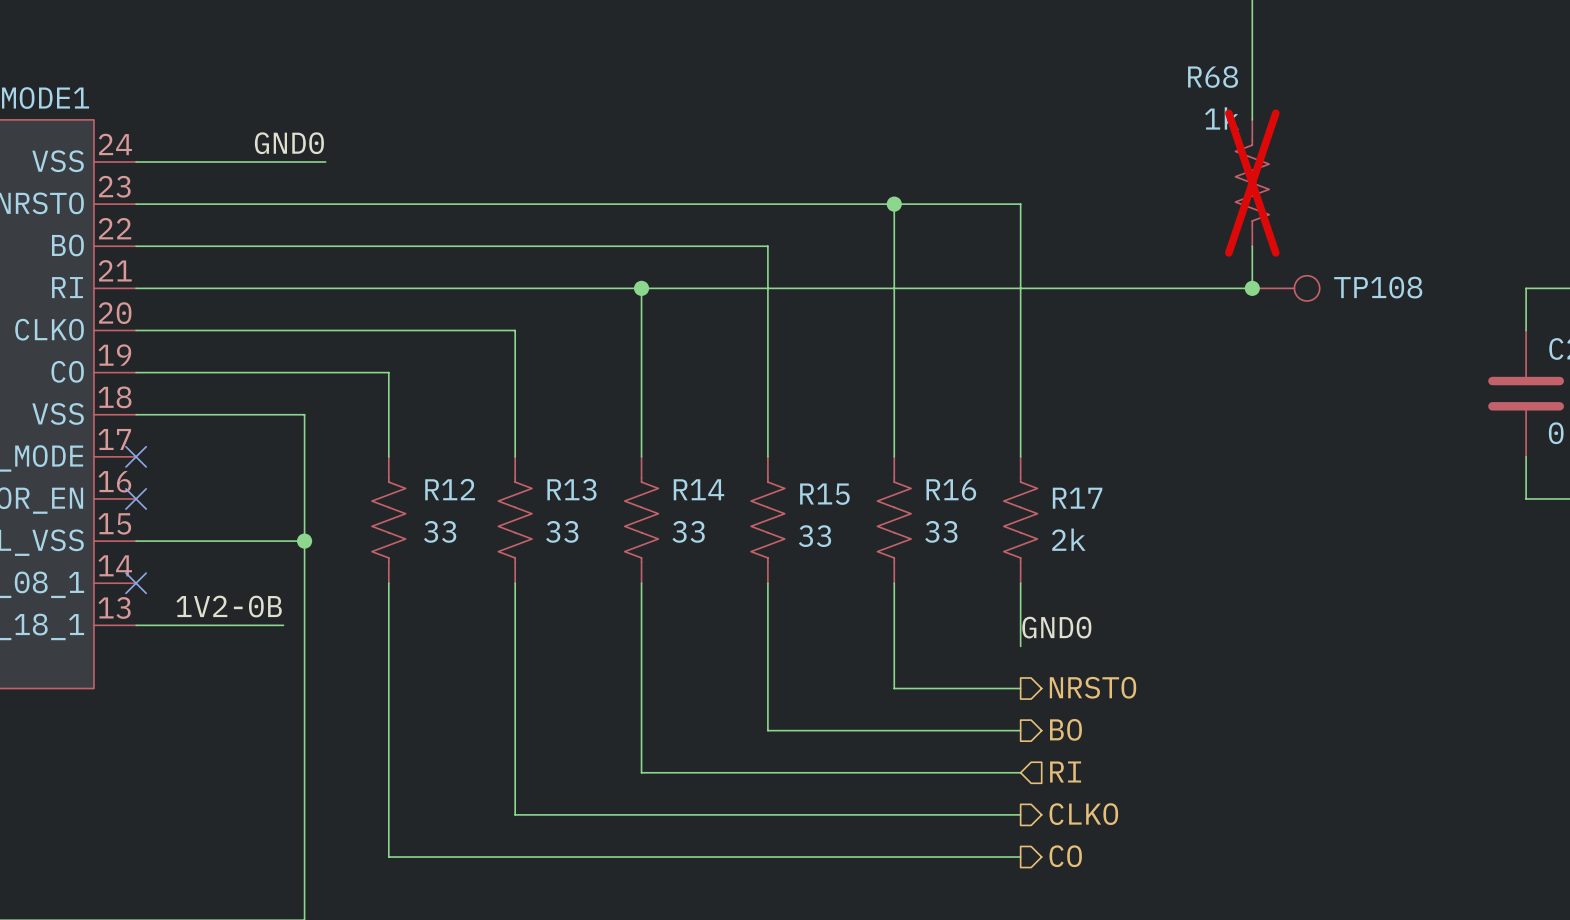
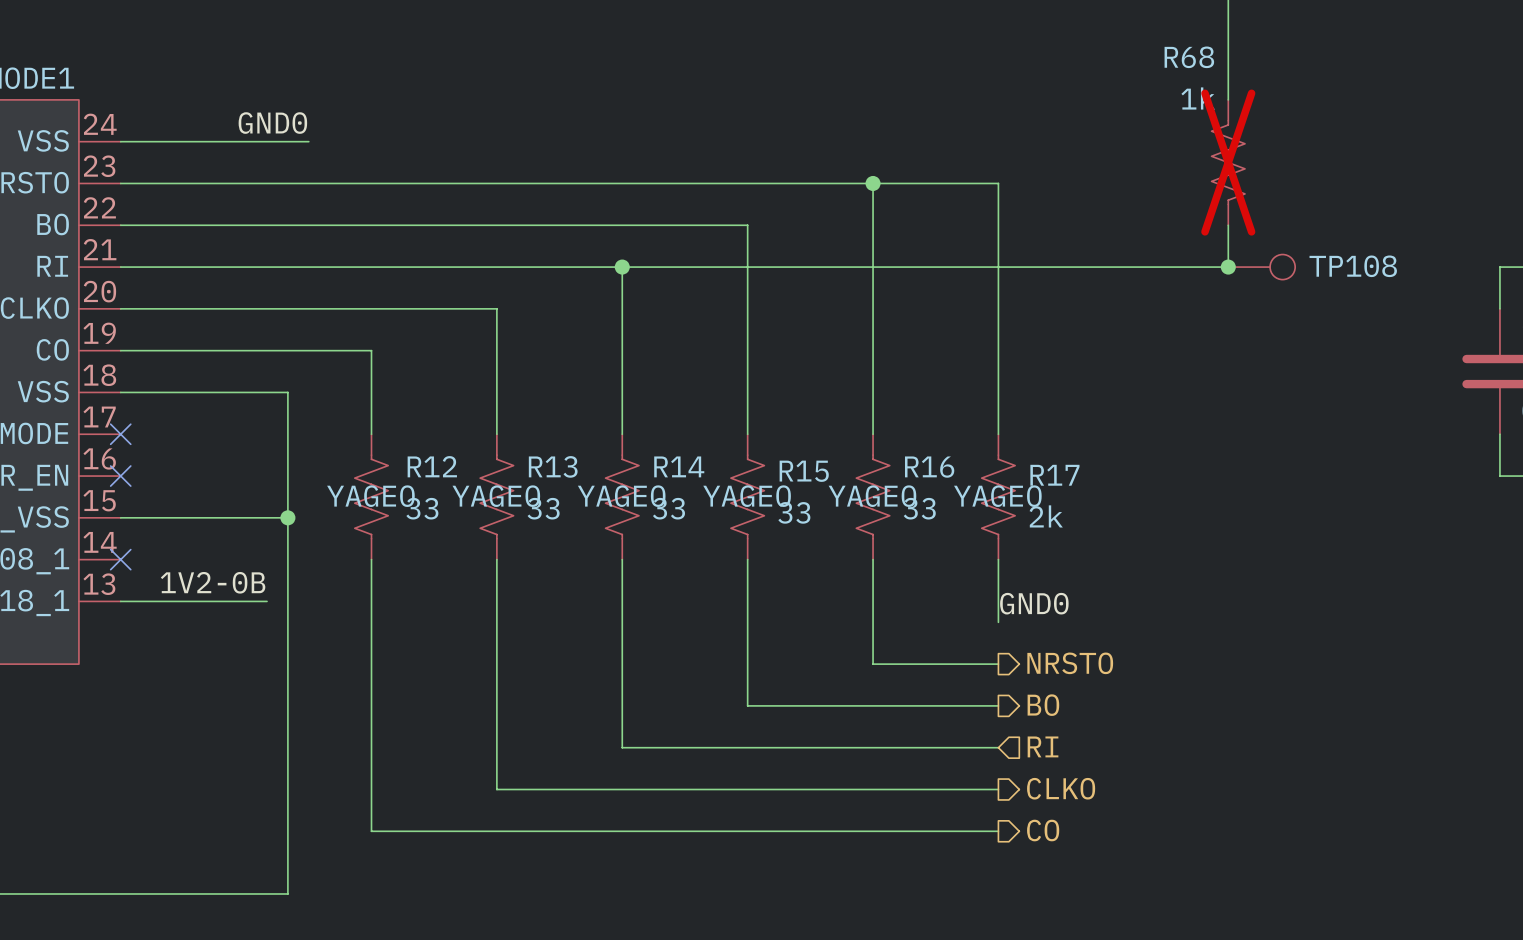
R12 text: none -> YAGEO (370, 496)
R13 text: none -> YAGEO (496, 496)
R14 text: none -> YAGEO (621, 496)
R15 text: none -> YAGEO (747, 496)
R16 text: none -> YAGEO (872, 496)
R17 text: none -> YAGEO (997, 496)

